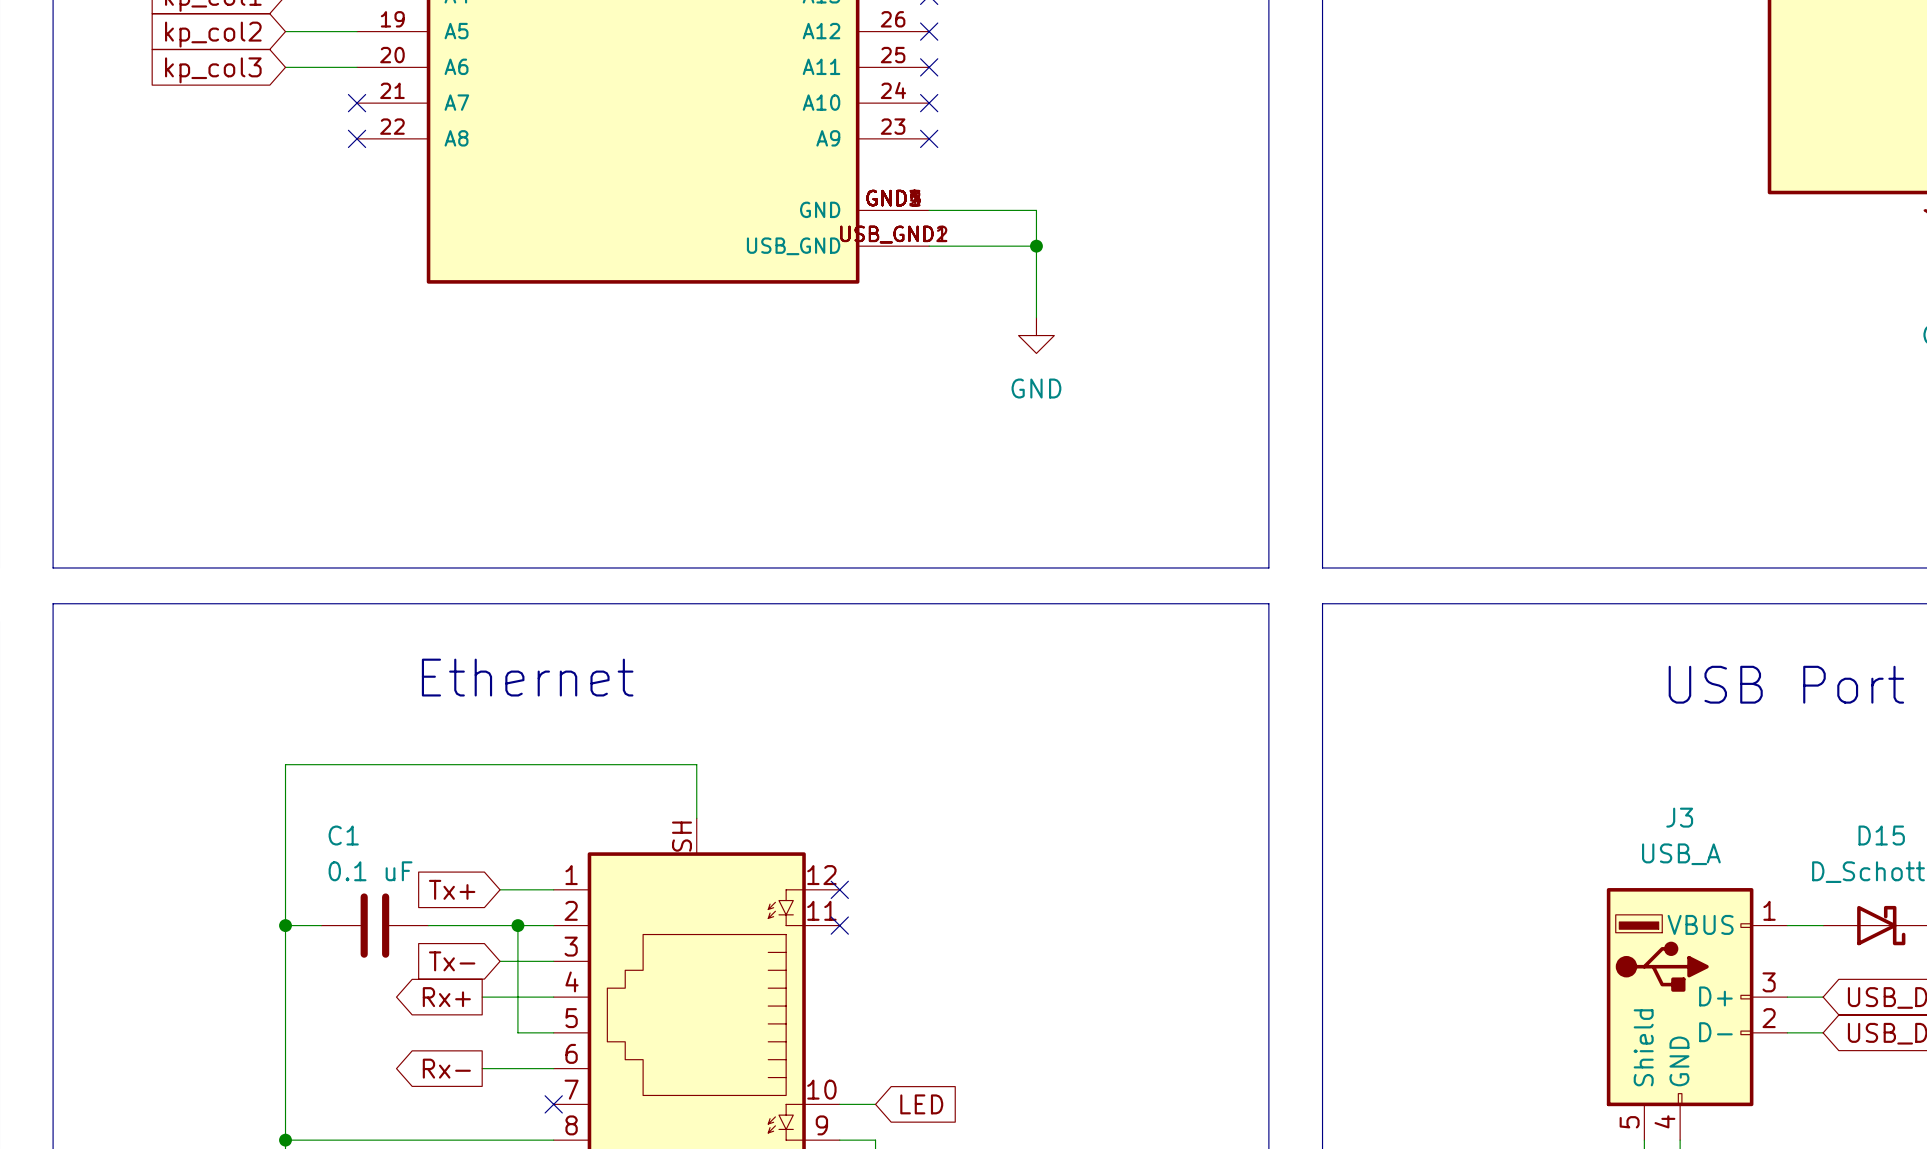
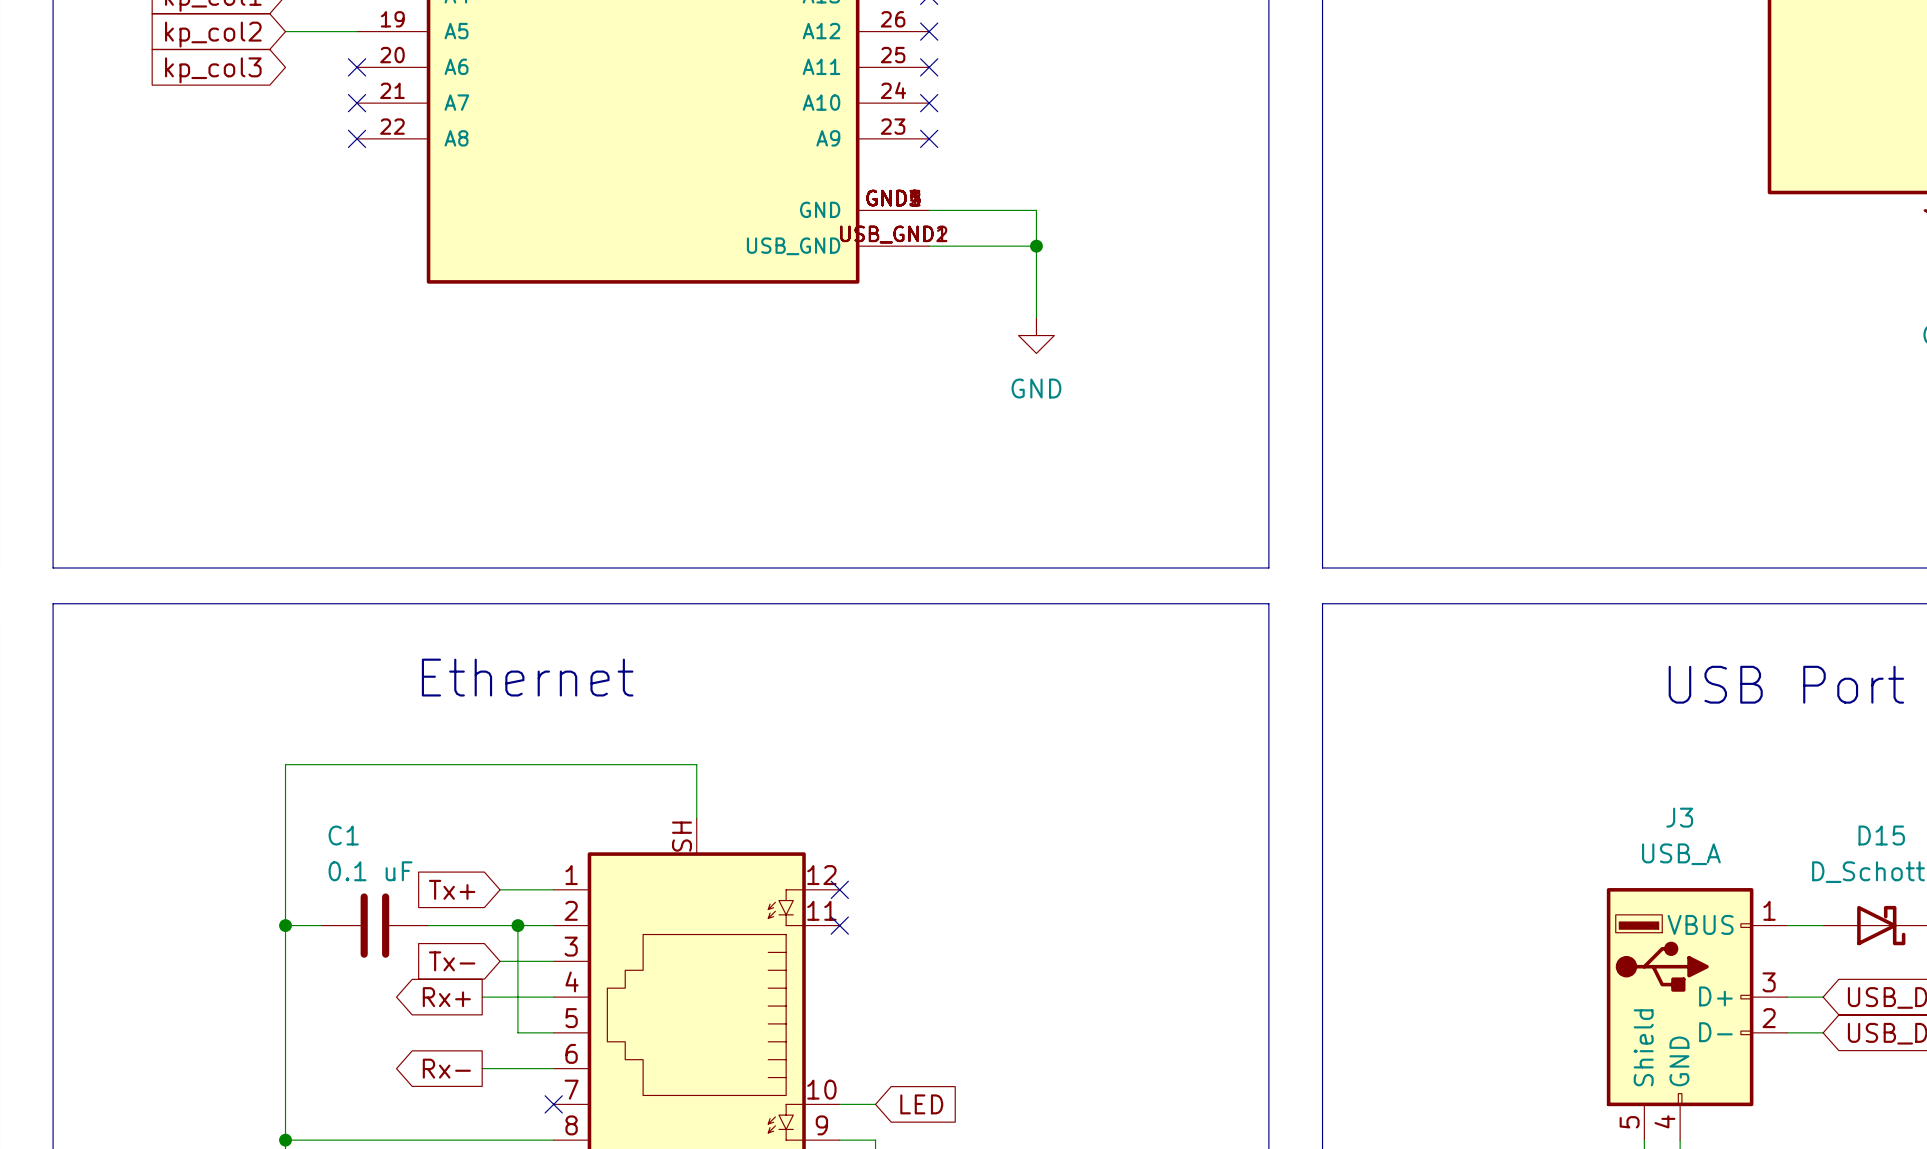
wire: (285, 67) (357, 67) -> none
no-connect mark: none -> (357, 67)

